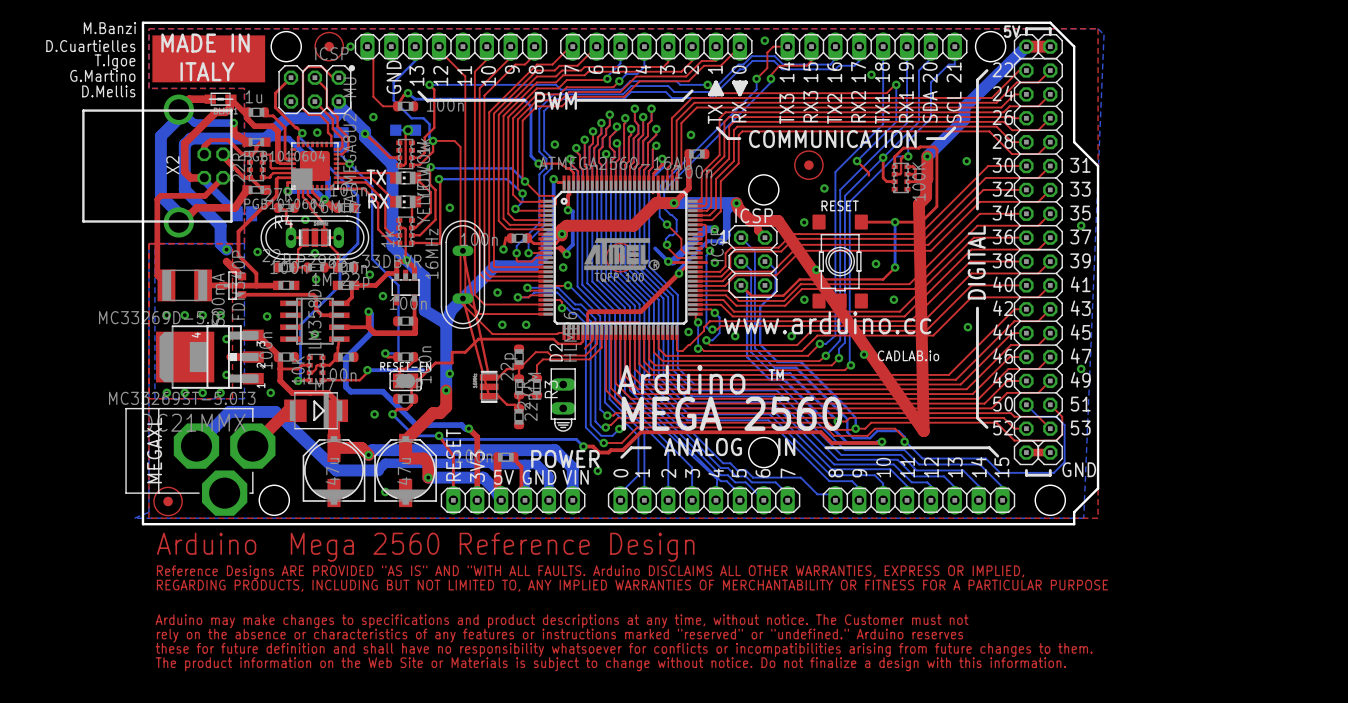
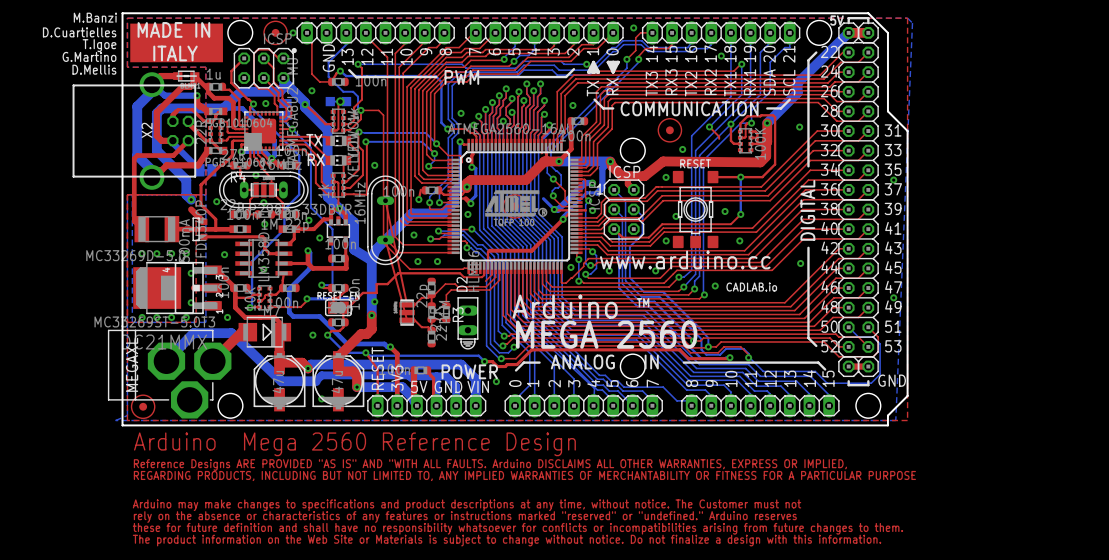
top track: (918, 204) (923, 431) (778, 220) -> (760, 162) (663, 161) (644, 176)

